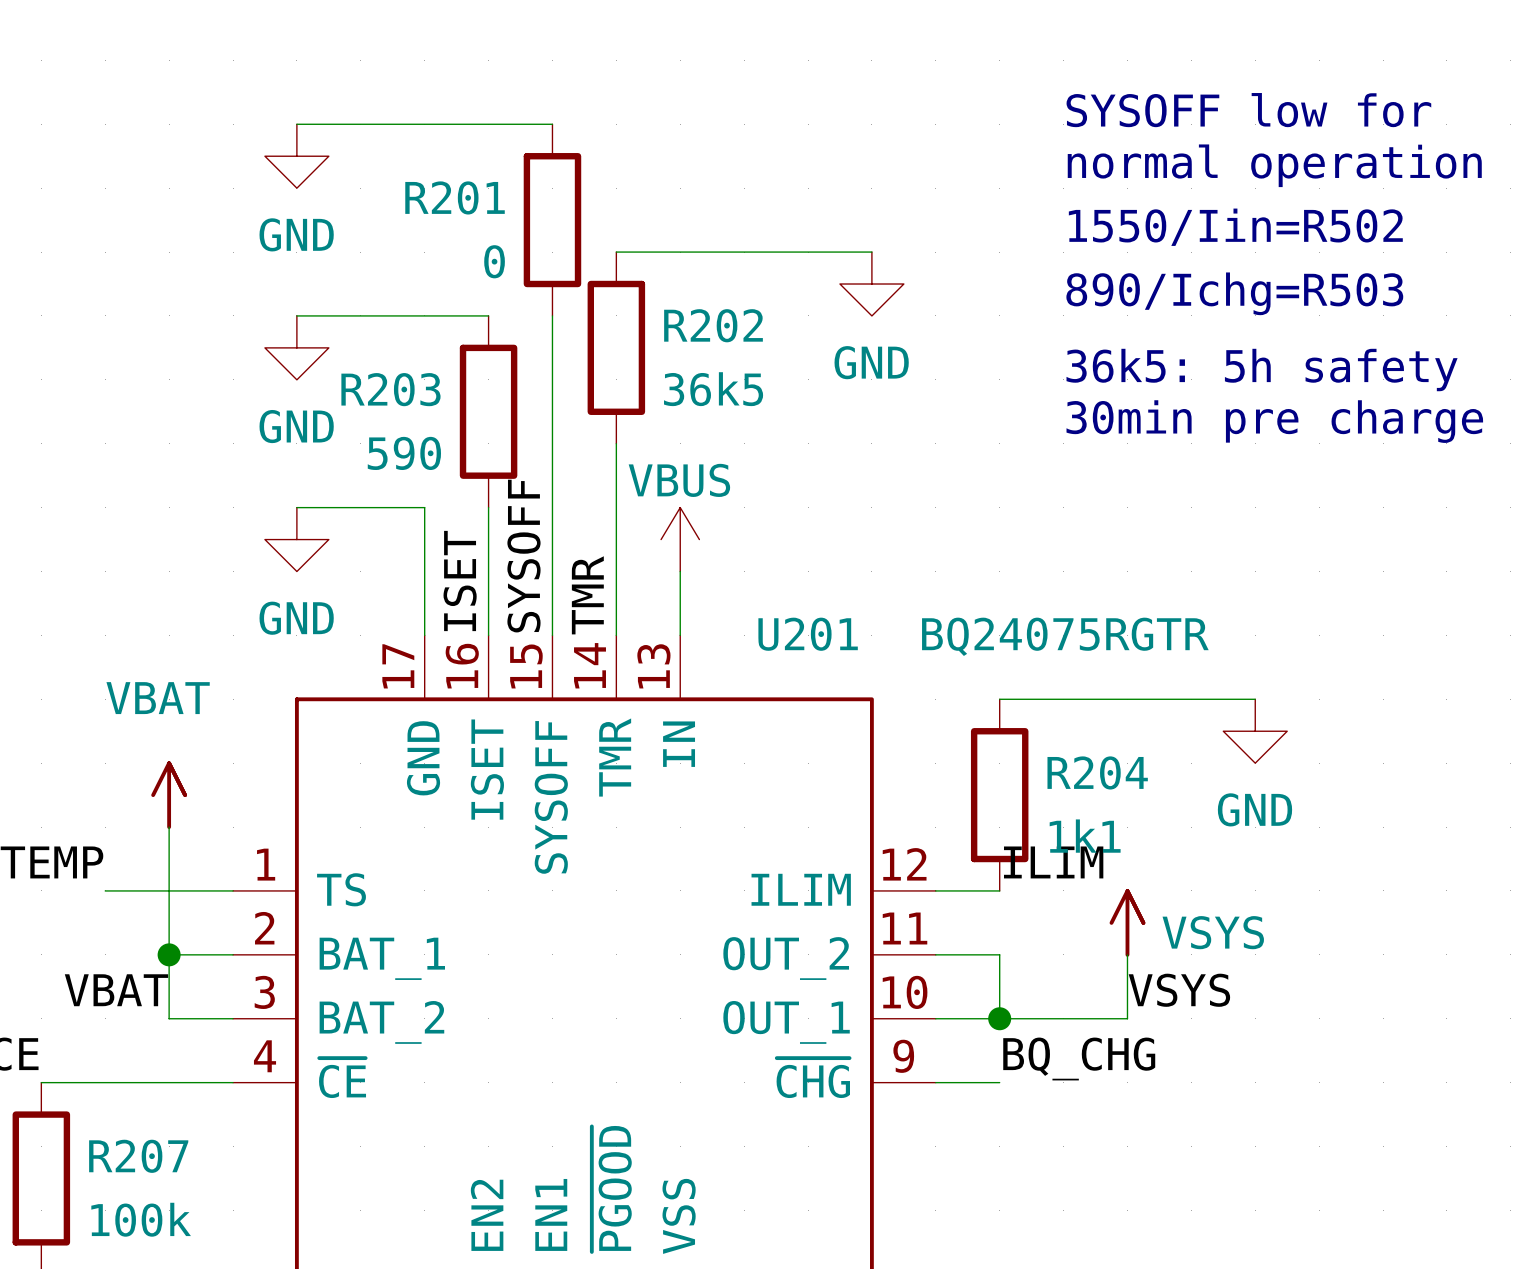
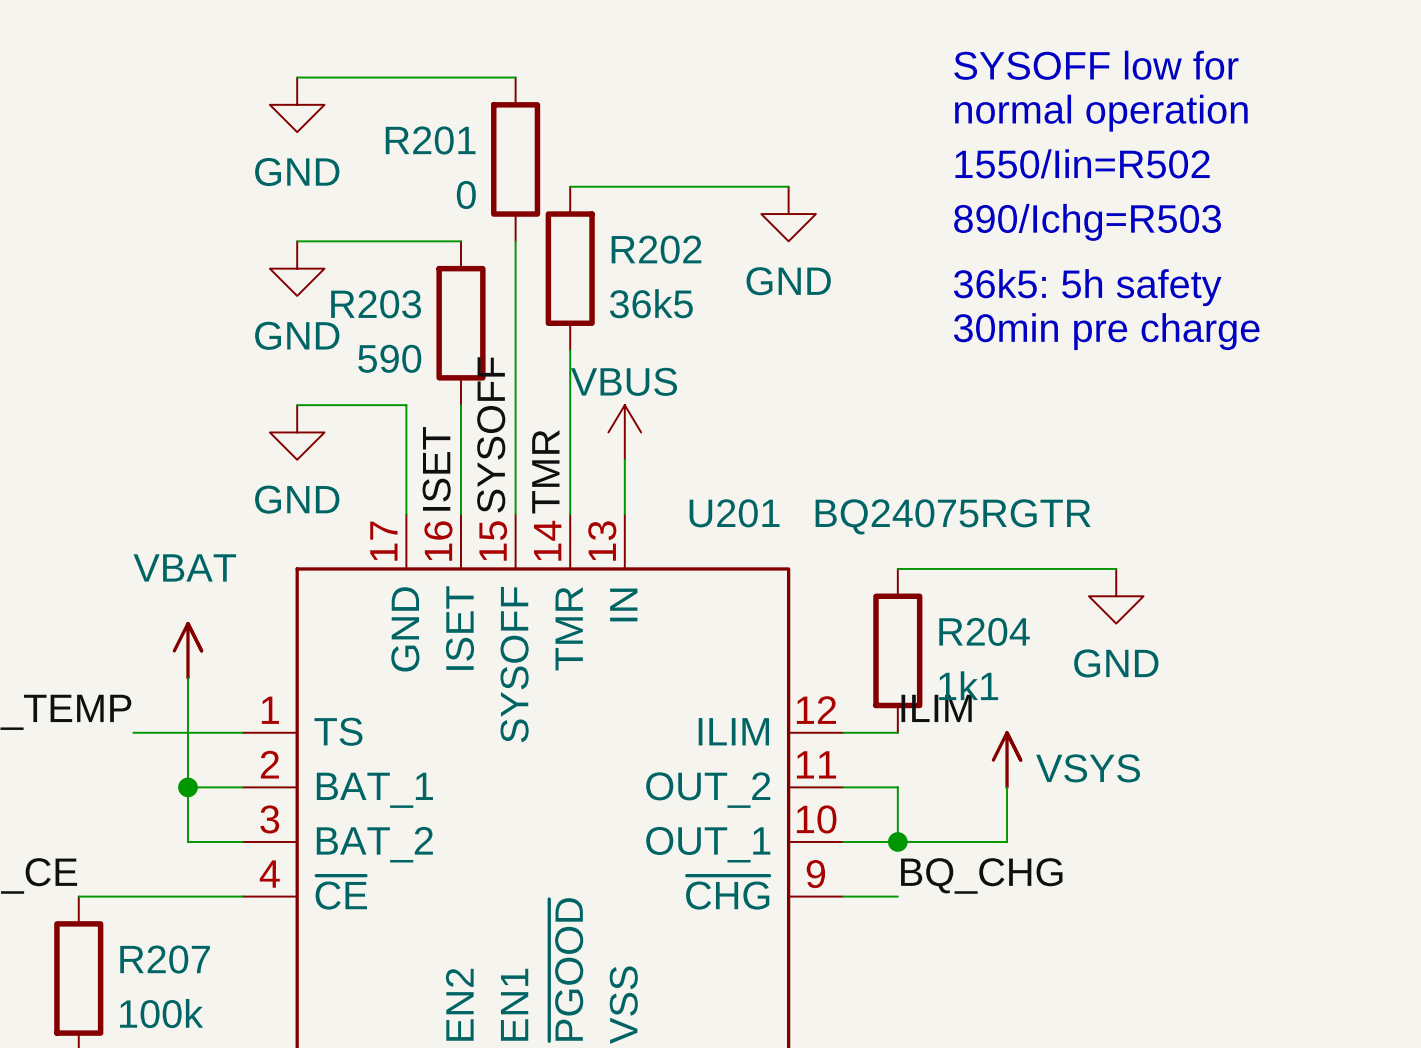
label: VBAT (116, 990) -> none
label: VSYS (1179, 990) -> none

